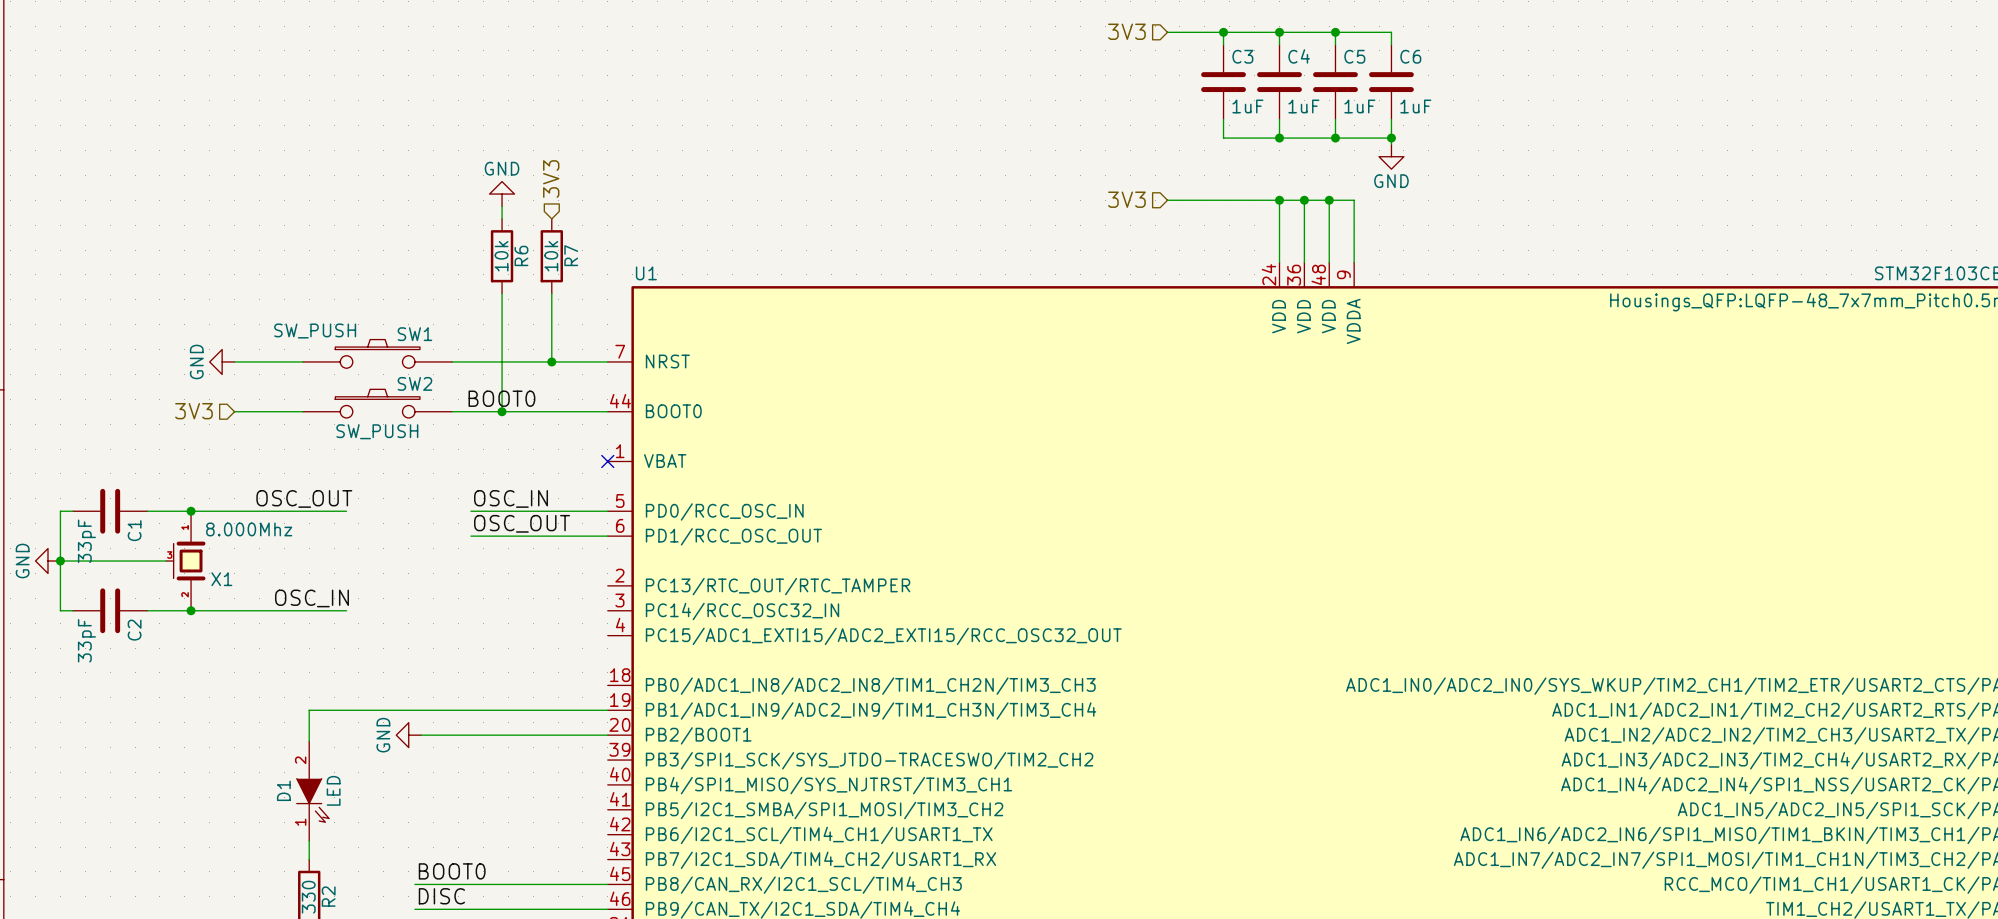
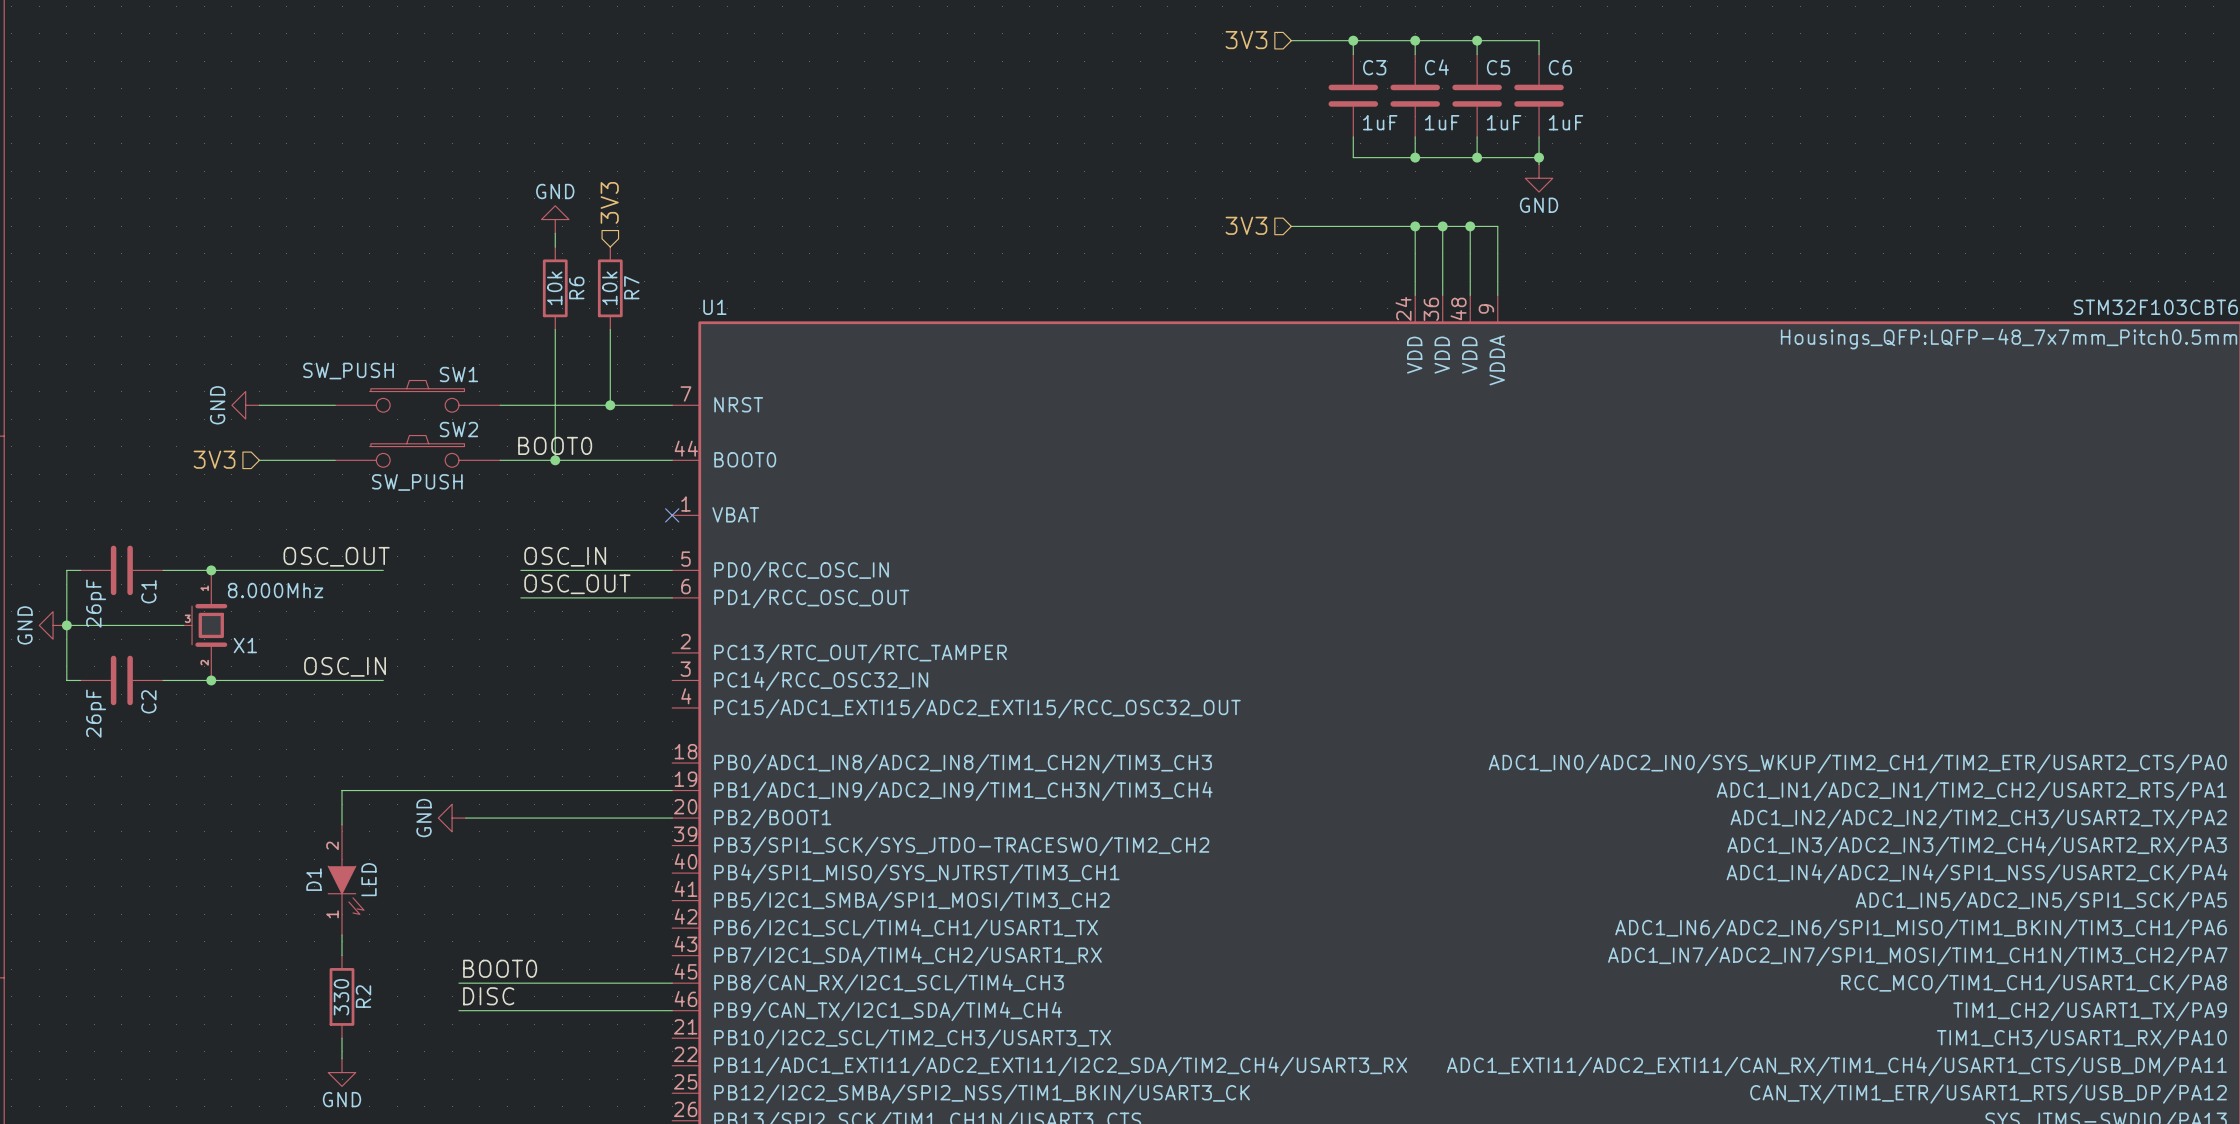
C1 value: 33pF (86, 541) -> 26pF (96, 603)
C2 value: 33pF (86, 640) -> 26pF (96, 713)

